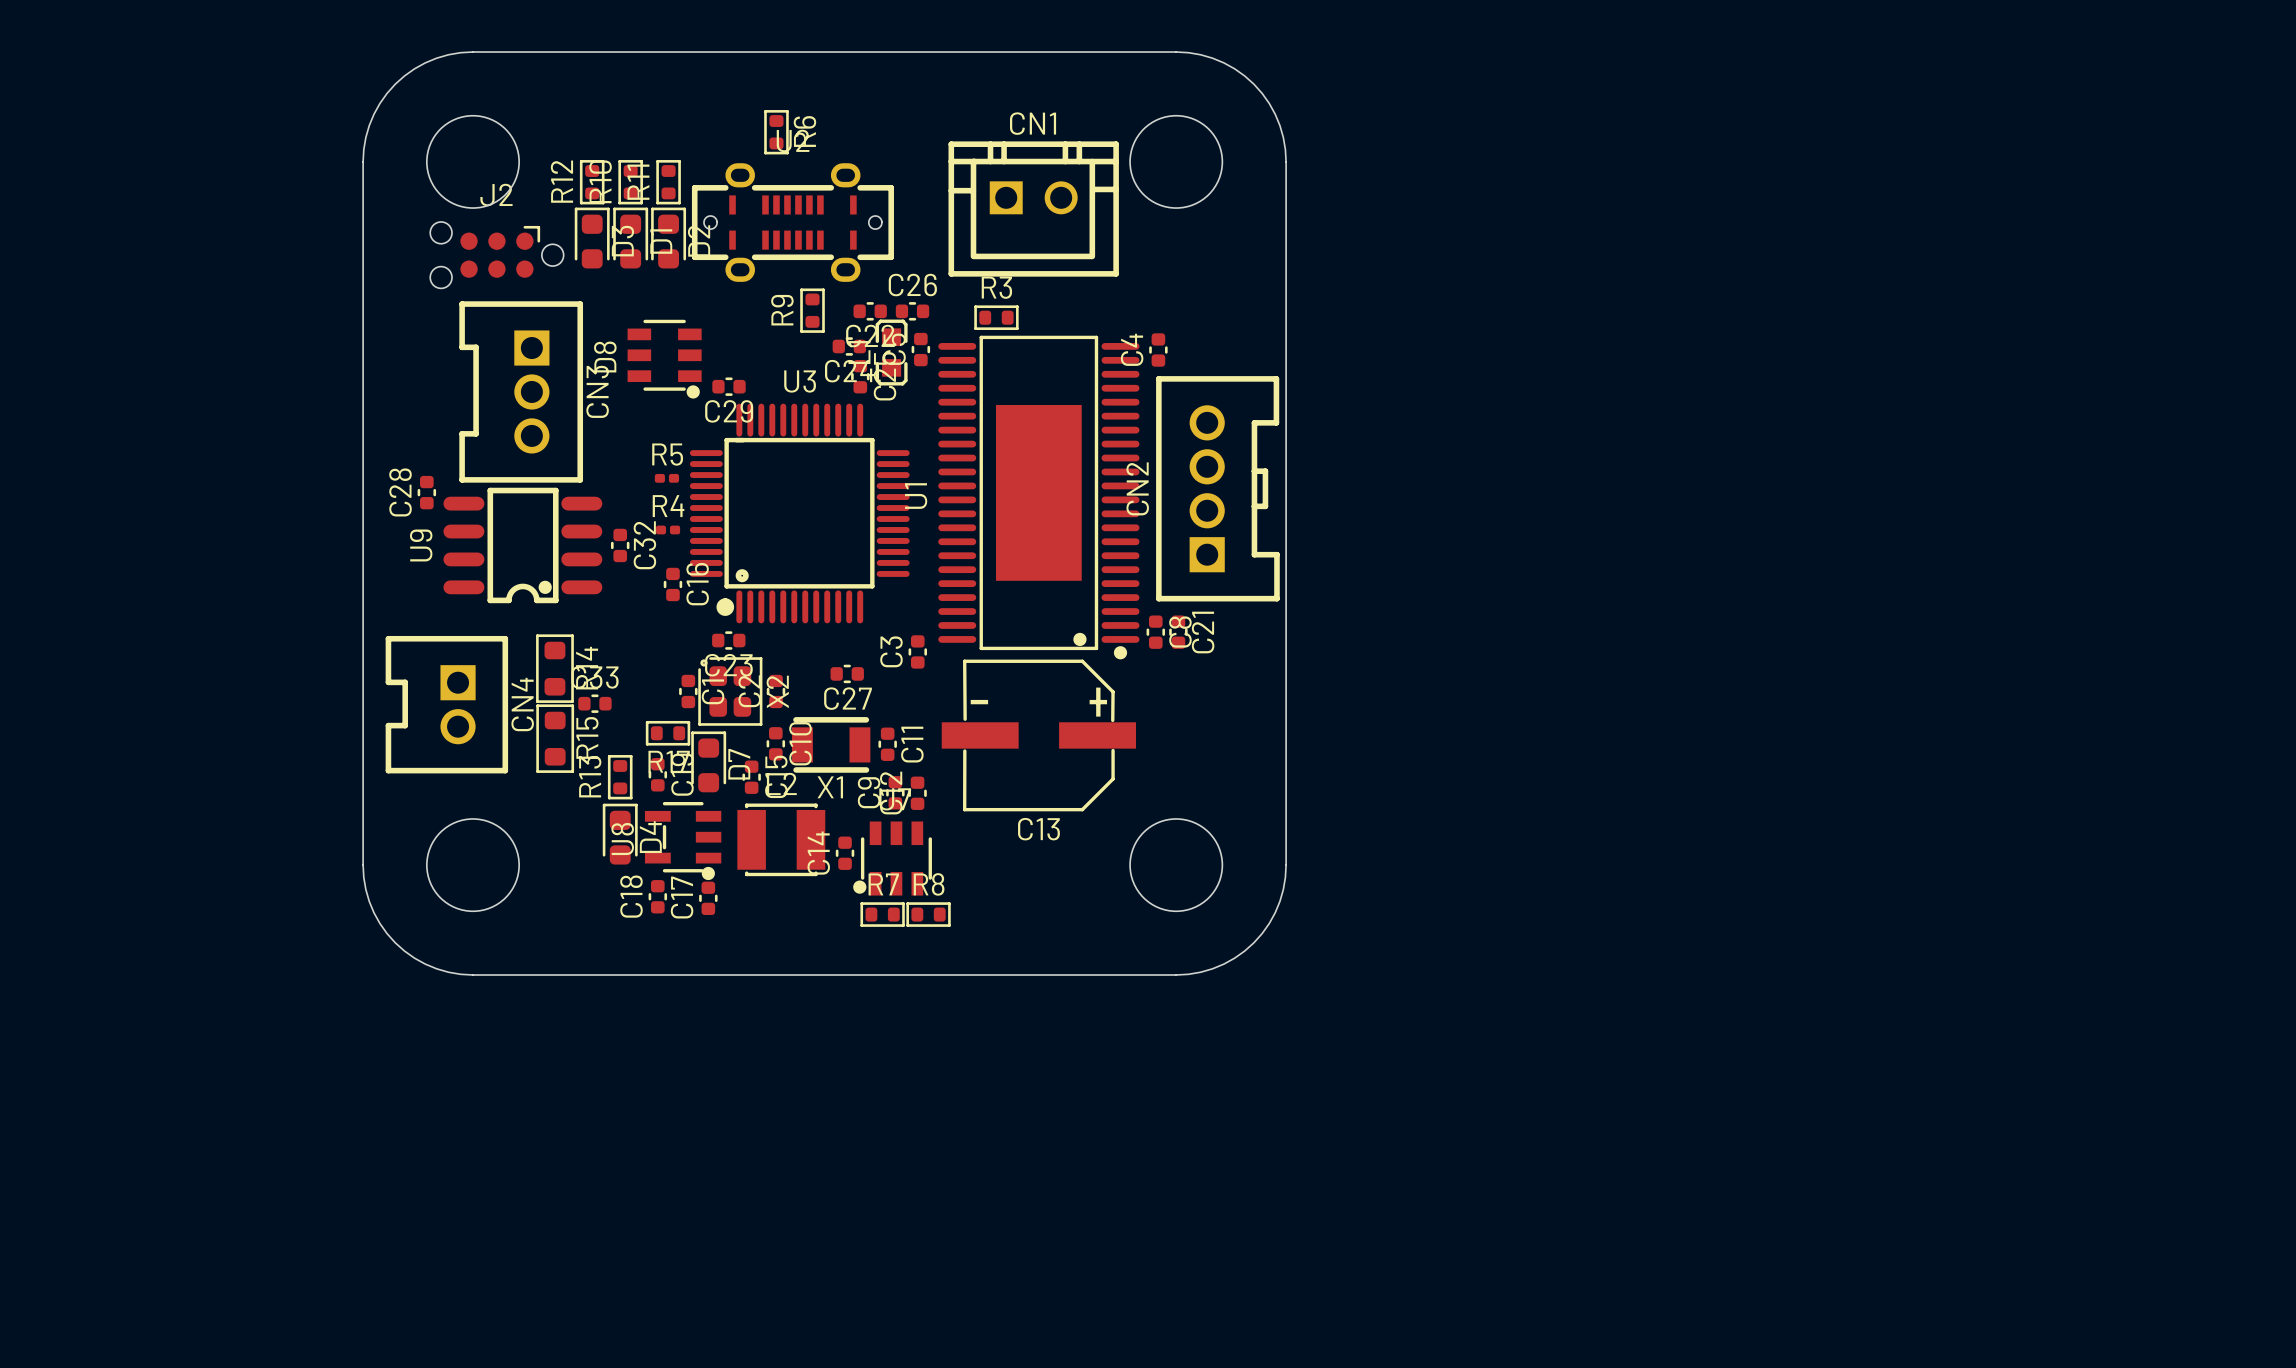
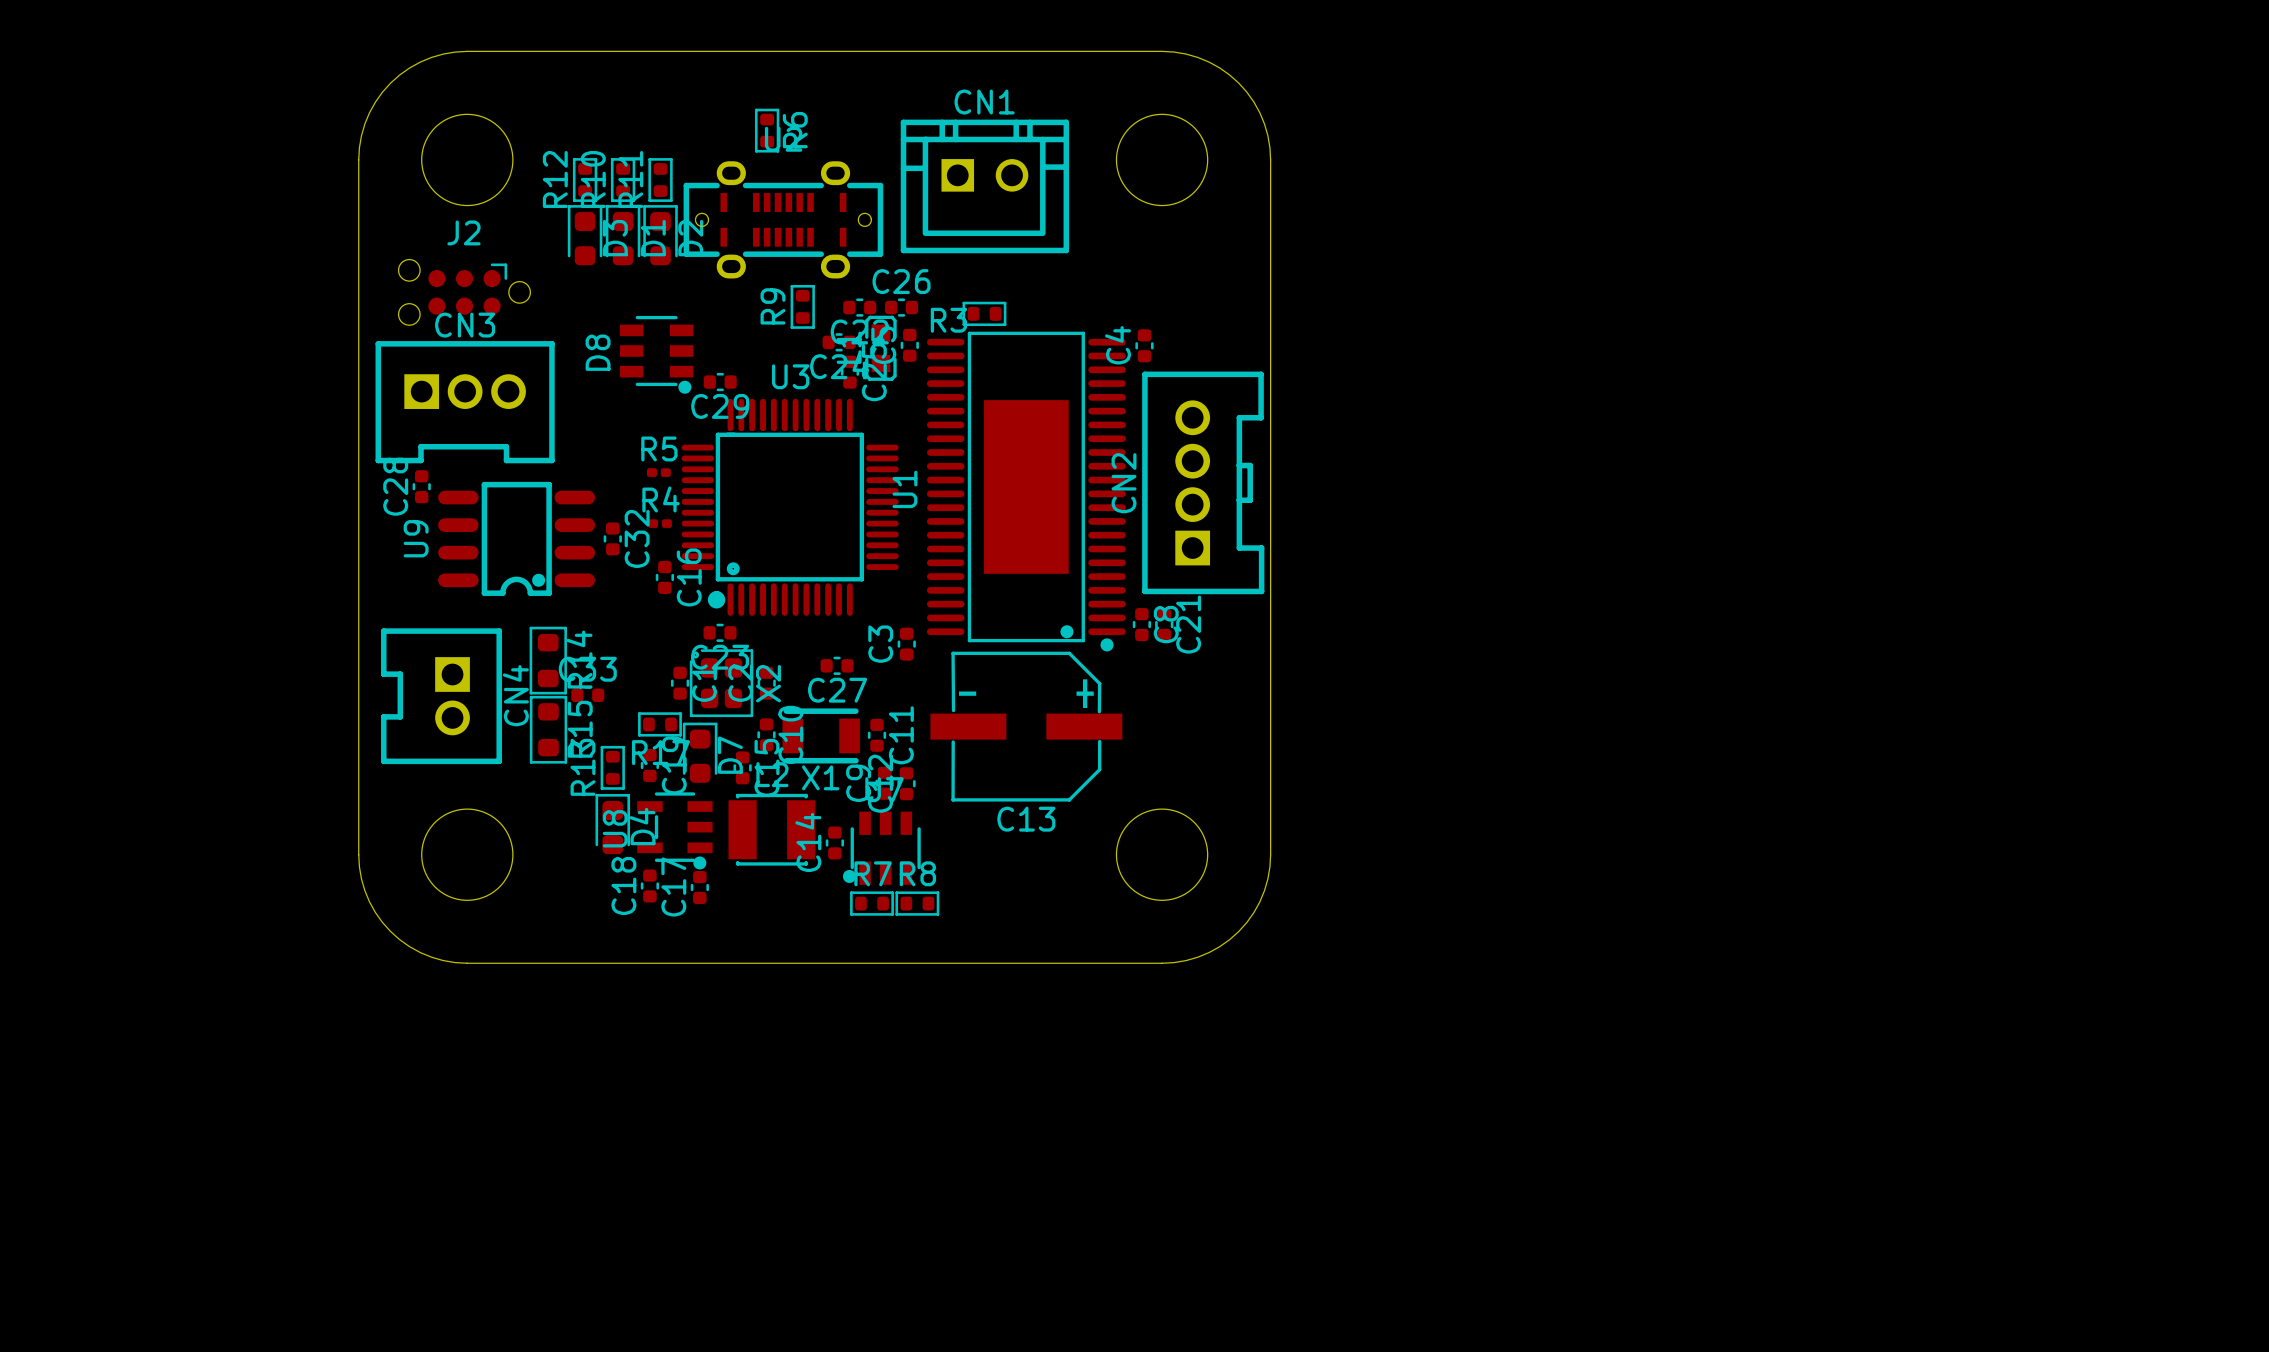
CN1 position: (1033, 209) -> (984, 186)
J2 position: (496, 255) -> (464, 292)
R3 name position: R3 (996, 287) -> R3 (948, 320)
CN3 rotation: 0° (521, 391) -> 90° counterclockwise (465, 402)

